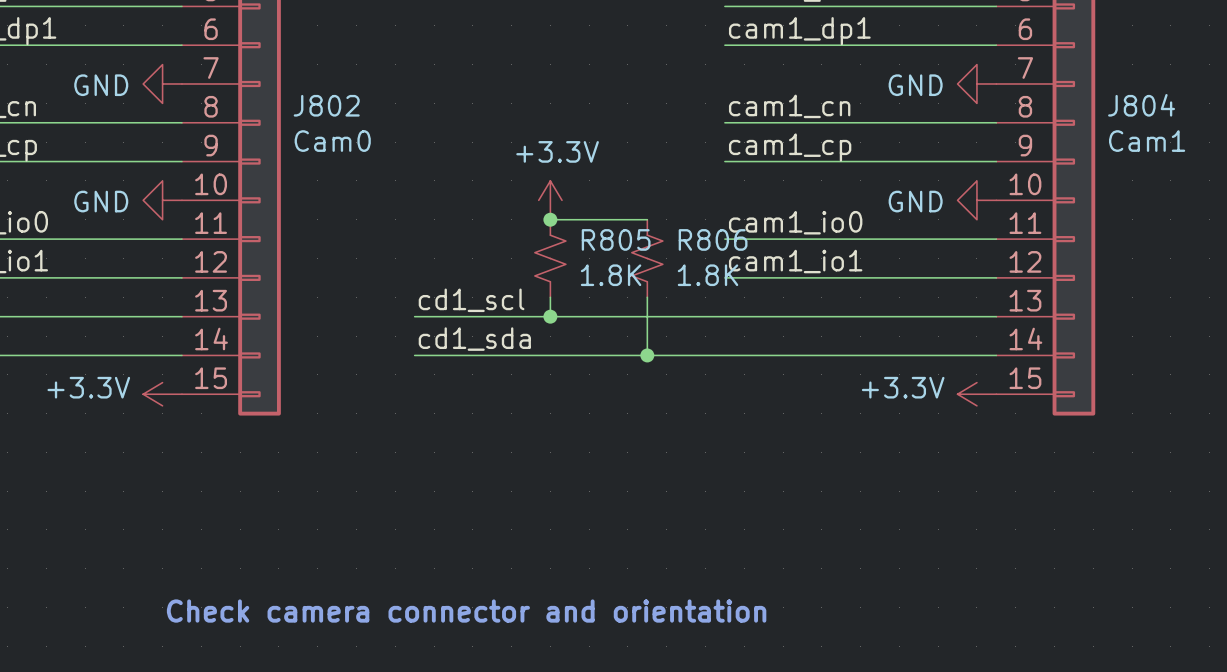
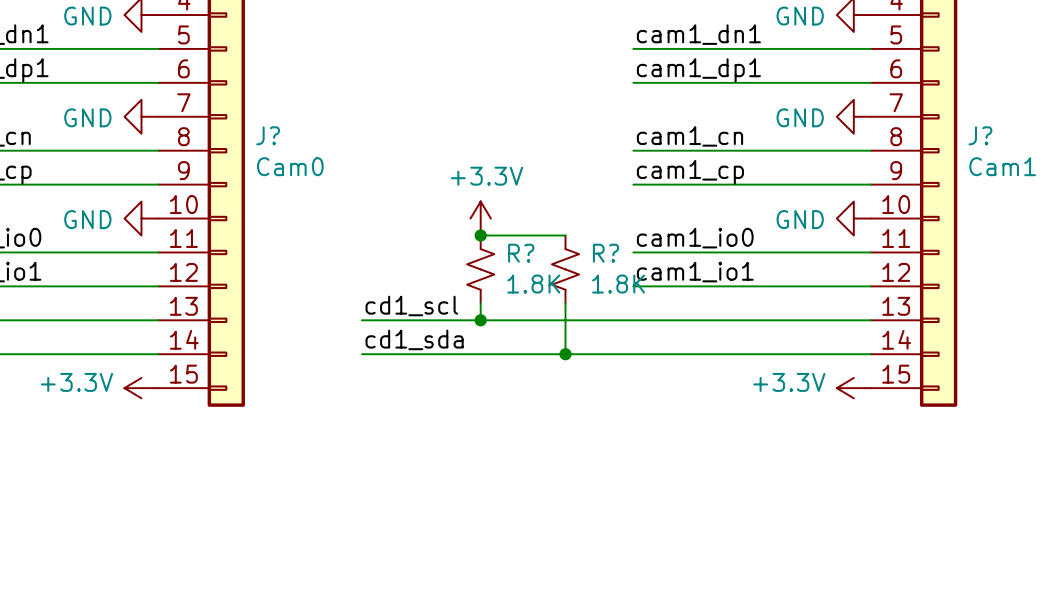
J802 name: J802 (326, 105) -> J? (268, 135)
J804 name: J804 (1141, 105) -> J? (980, 135)
R805 name: R805 (616, 239) -> R? (521, 253)
R806 name: R806 (713, 239) -> R? (606, 253)
text: Check camera connector and orientation (466, 611) -> none

